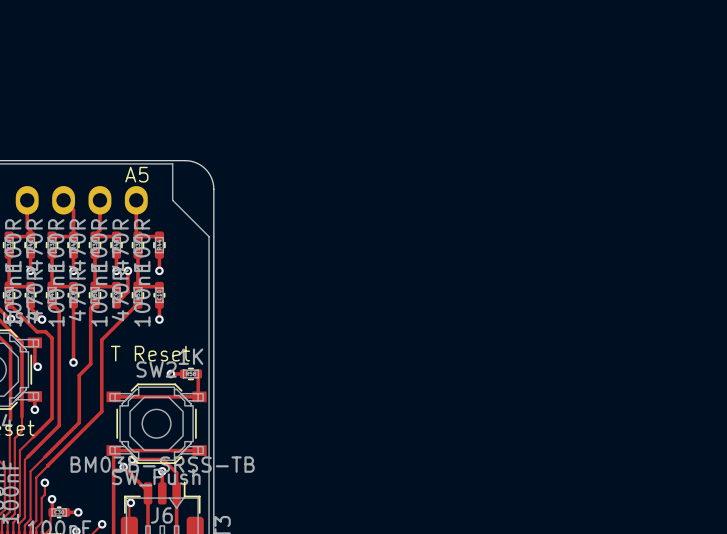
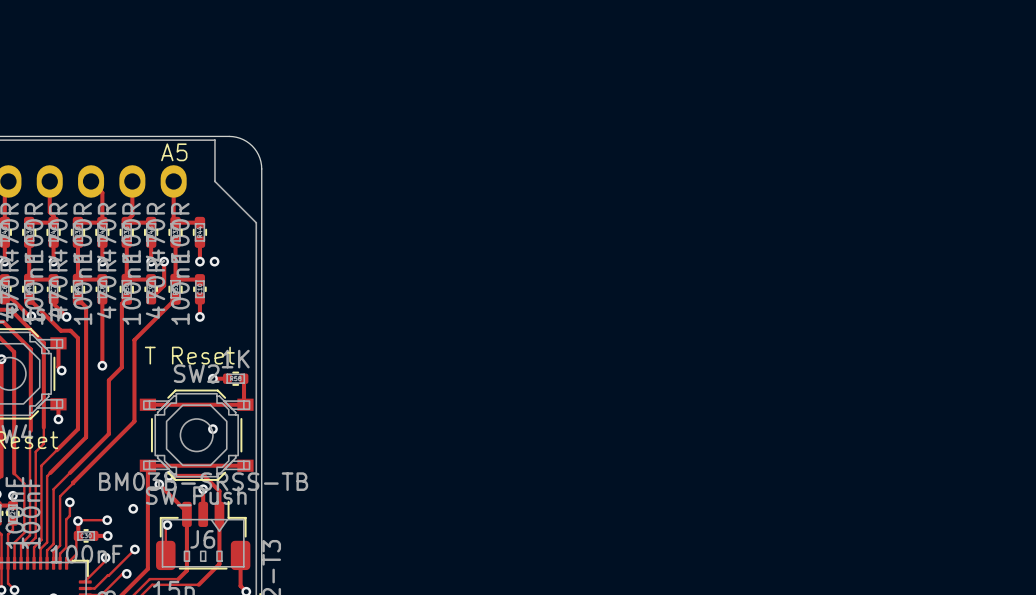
via: none -> (214, 261)
via: none -> (212, 429)
via: none -> (133, 508)
track: none -> (107, 520) (78, 521)
via: none -> (107, 520)

